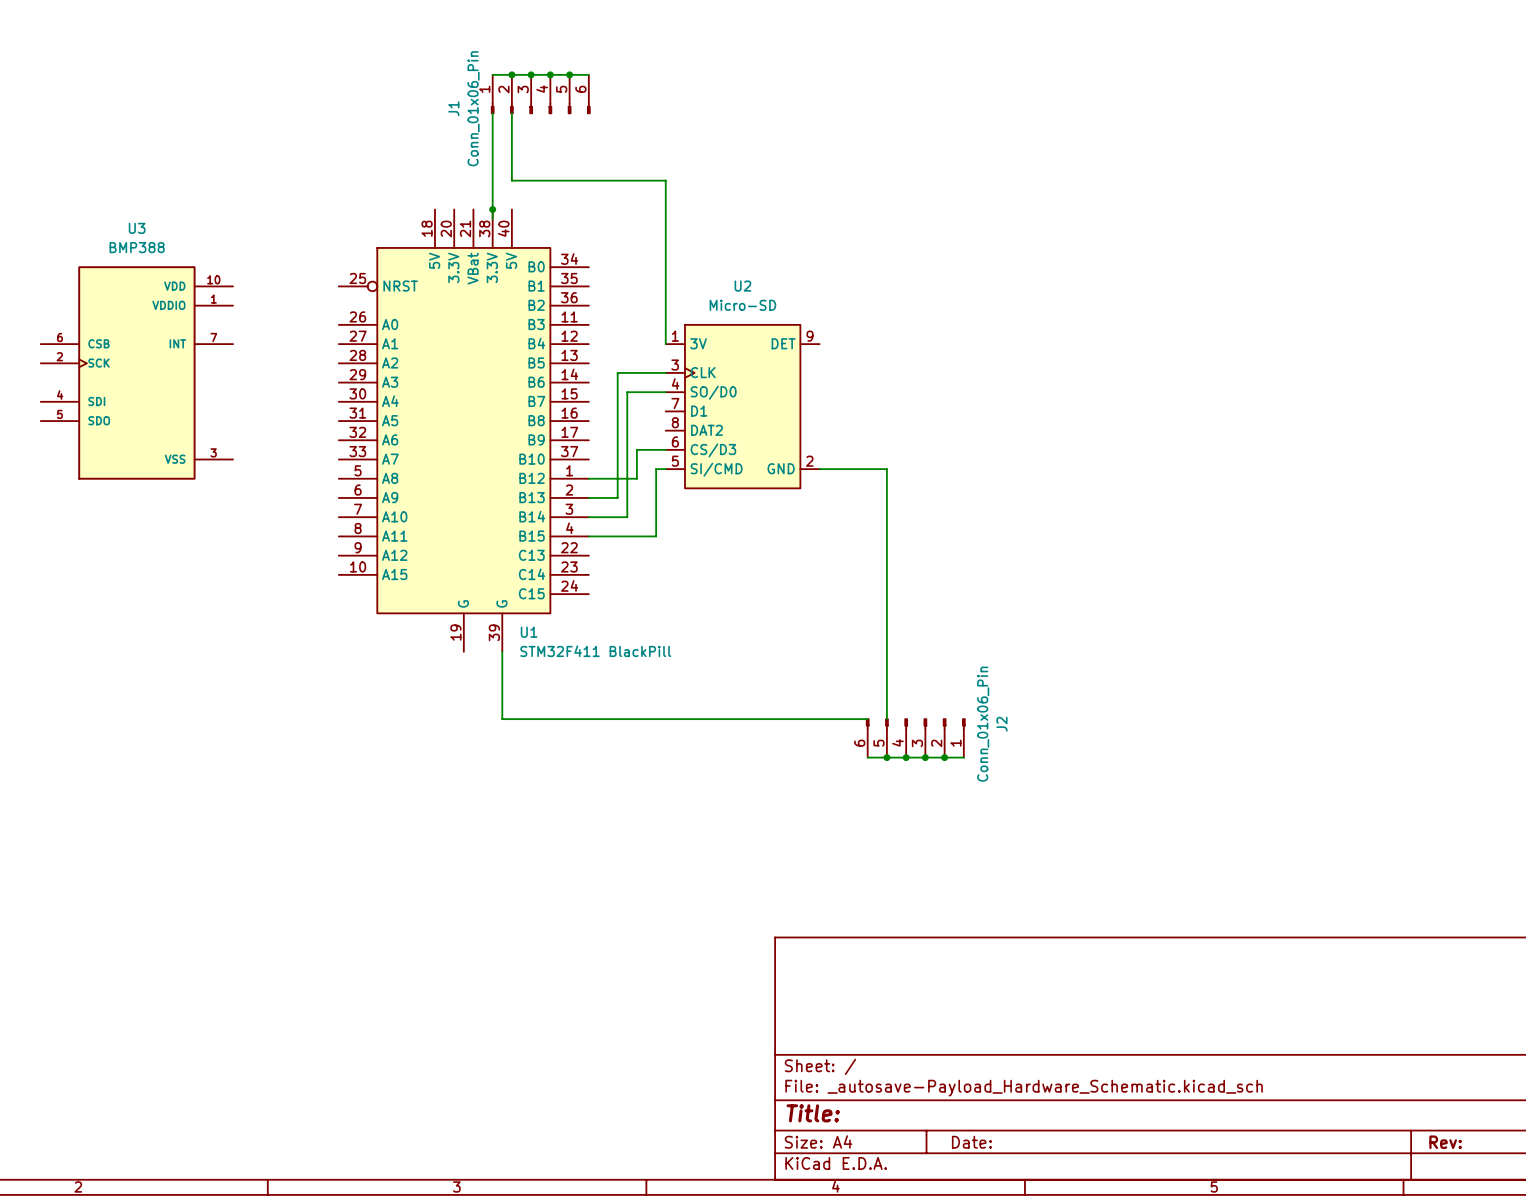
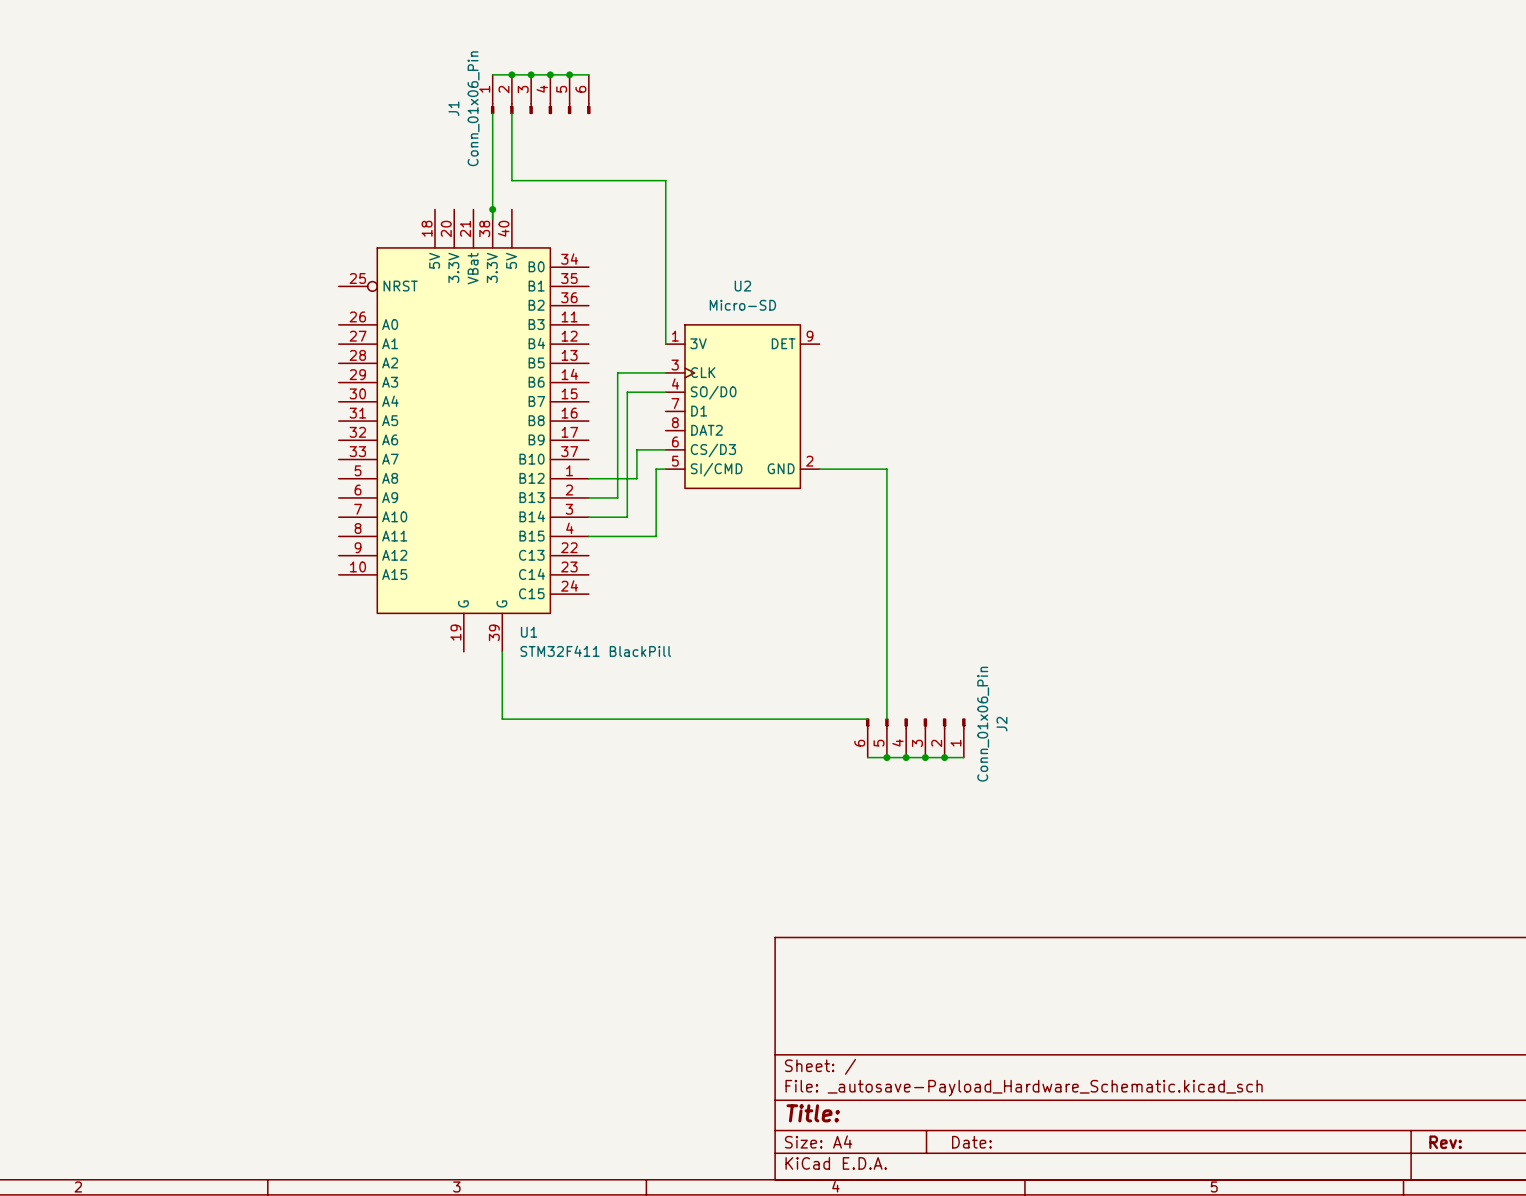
U3: BMP388 (136, 372) -> none

